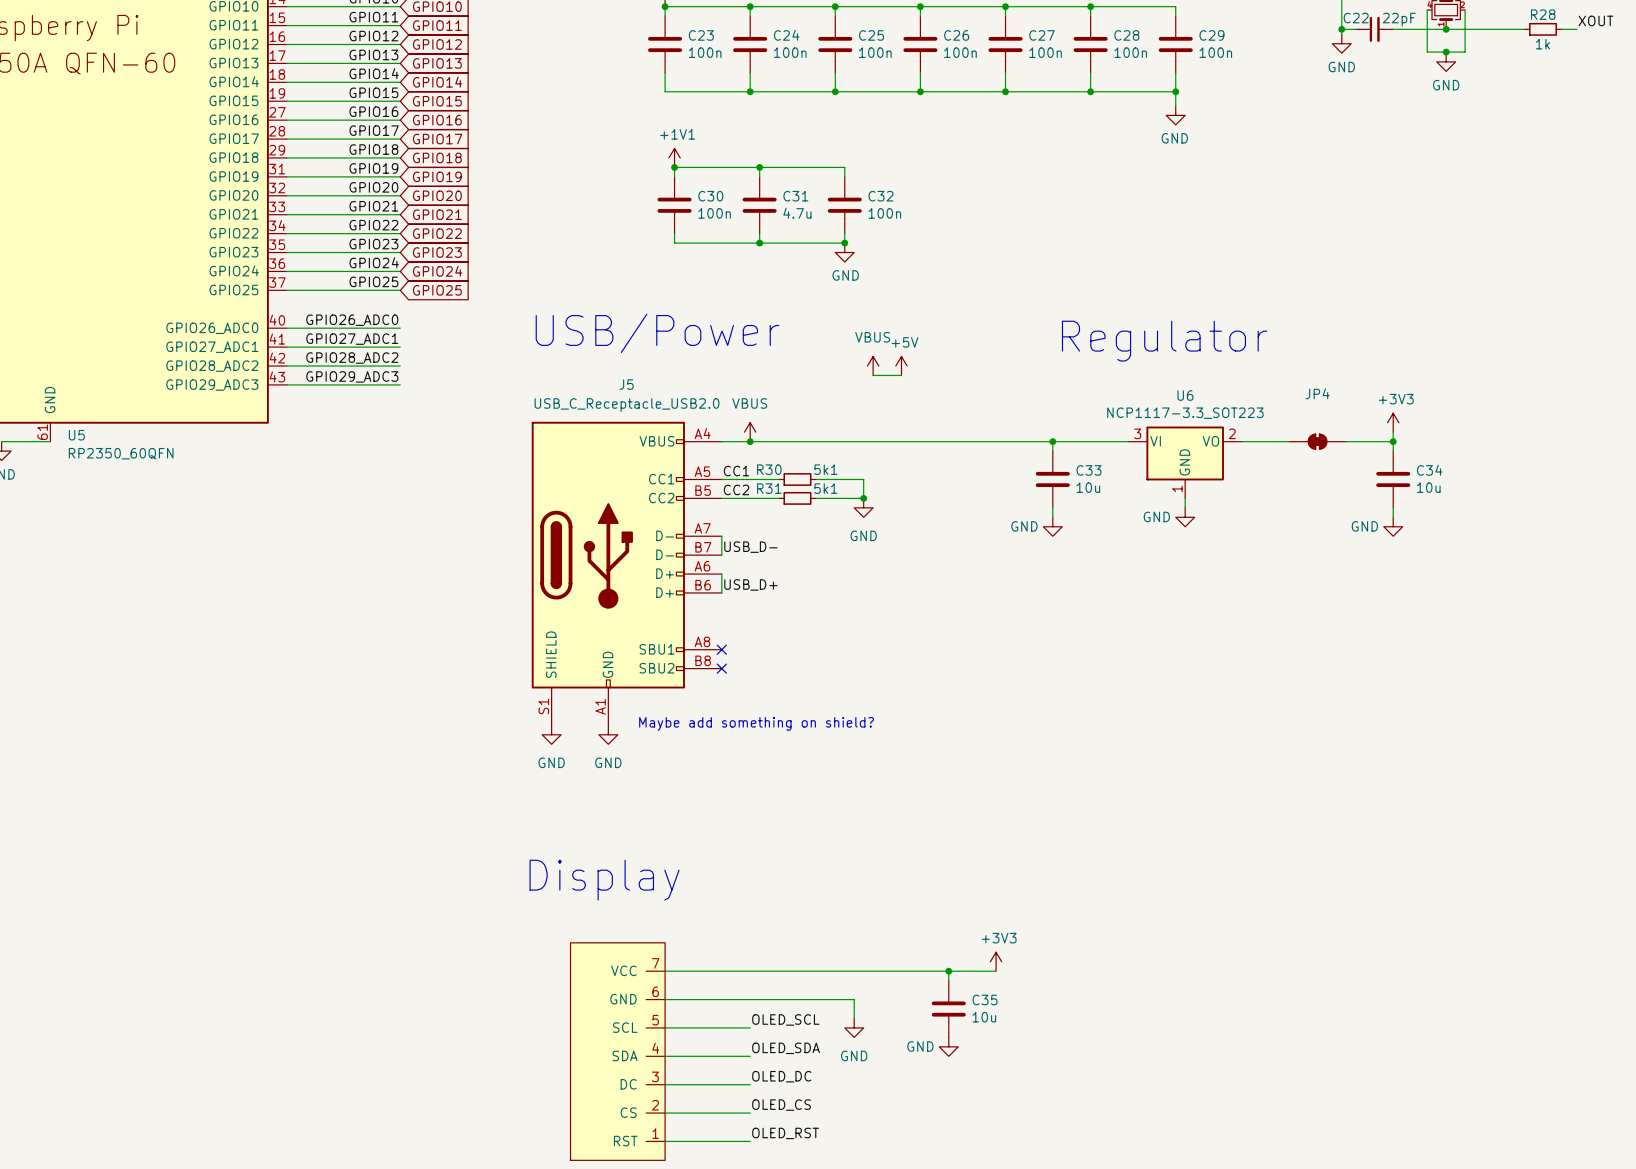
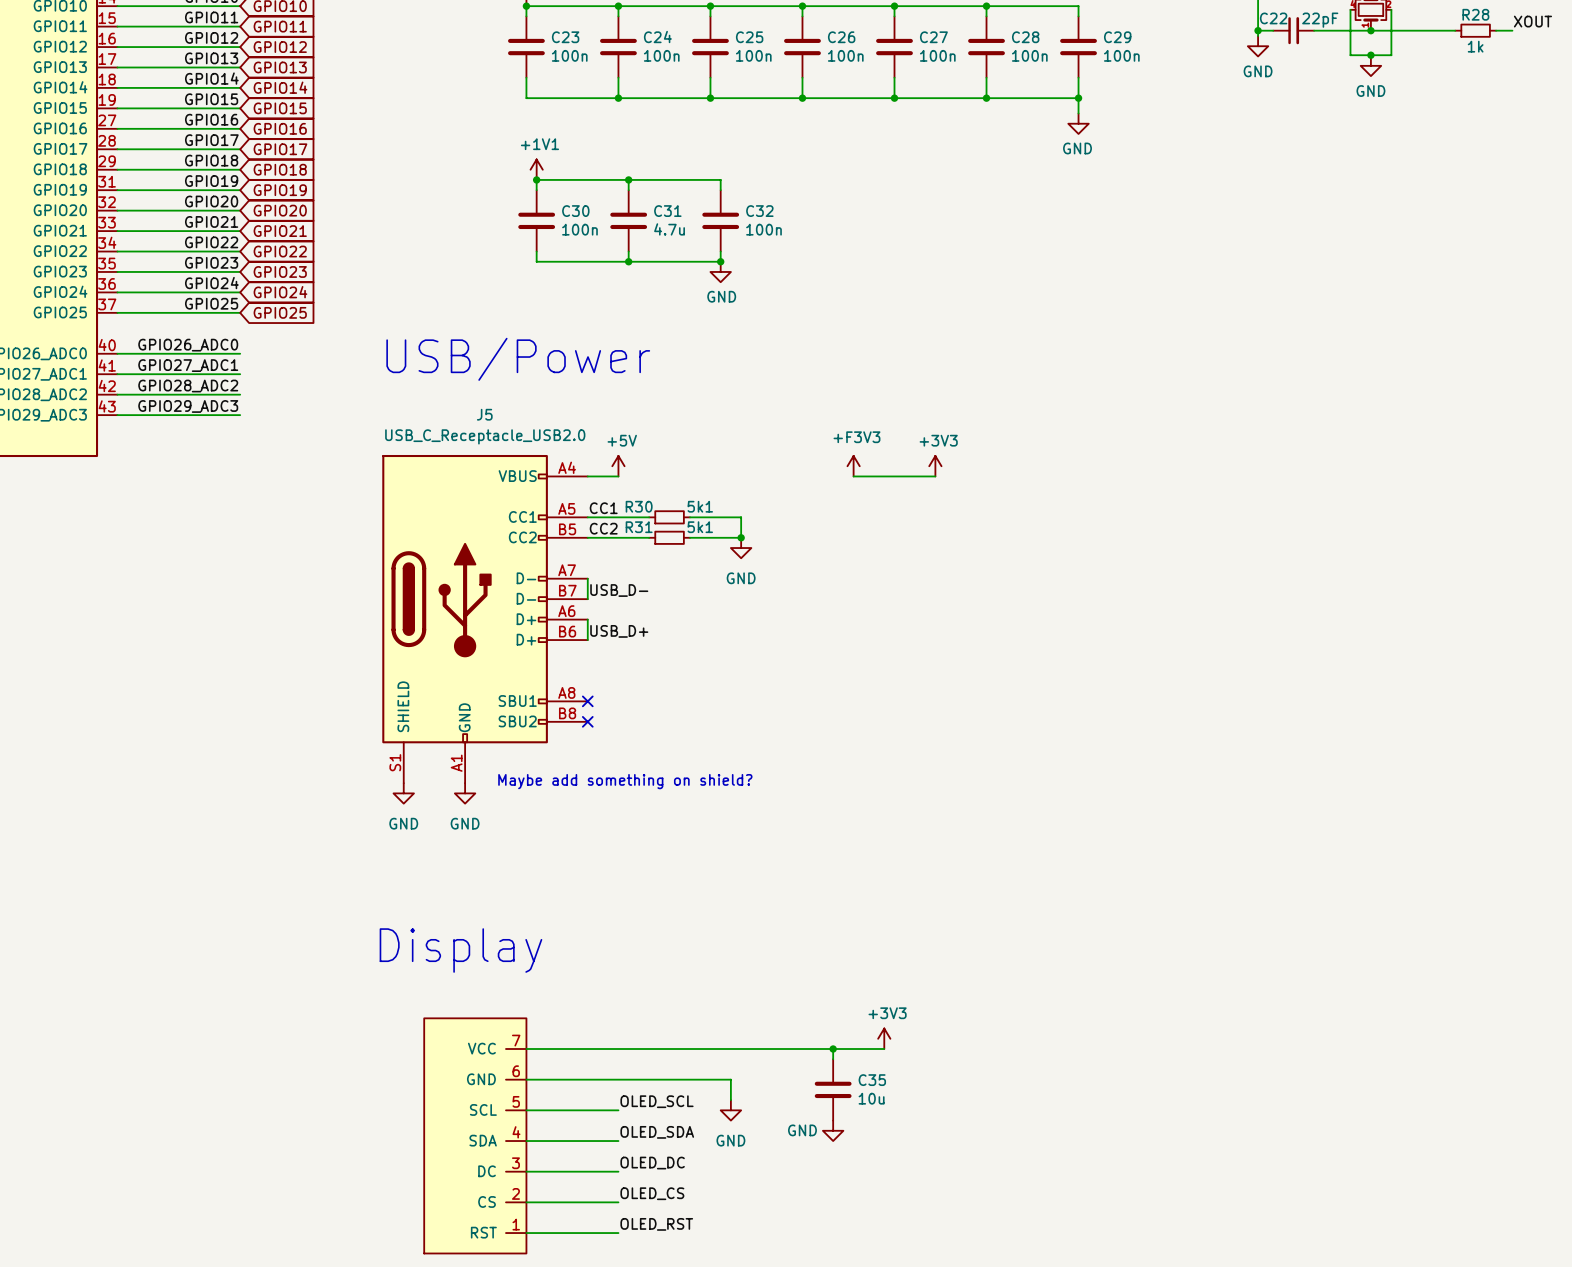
text: Regulator (1164, 341) -> none
power symbol: VBUS (873, 366) -> none
power symbol: +5V (901, 366) -> none
wire: (873, 375) (901, 375) -> none
power symbol: +3V3 (1393, 422) -> none
power symbol: VBUS (750, 432) -> +5V (618, 466)
power symbol: none -> +F3V3 (853, 466)
power symbol: none -> +3V3 (935, 466)
wire: (1393, 432) (1393, 451) -> none
wire: (750, 441) (967, 441) -> none
junction: (750, 441) -> none
wire: (1043, 441) (1128, 441) -> none
wire: (1052, 441) (1052, 451) -> none
junction: (1052, 441) -> none
wire: (1241, 441) (1289, 441) -> none
JP4: (1317, 441) -> none
wire: (1345, 441) (1393, 441) -> none
junction: (1393, 441) -> none
U6: NCP1117-3.3_SOT223 (1185, 462) -> none
C33: 10u (1052, 479) -> none
C34: 10u (1393, 479) -> none
wire: (1185, 498) (1185, 507) -> none
wire: (1052, 507) (1052, 517) -> none
wire: (1393, 507) (1393, 517) -> none
power symbol: GND (1185, 517) -> none
power symbol: GND (1052, 526) -> none
power symbol: GND (1393, 526) -> none

